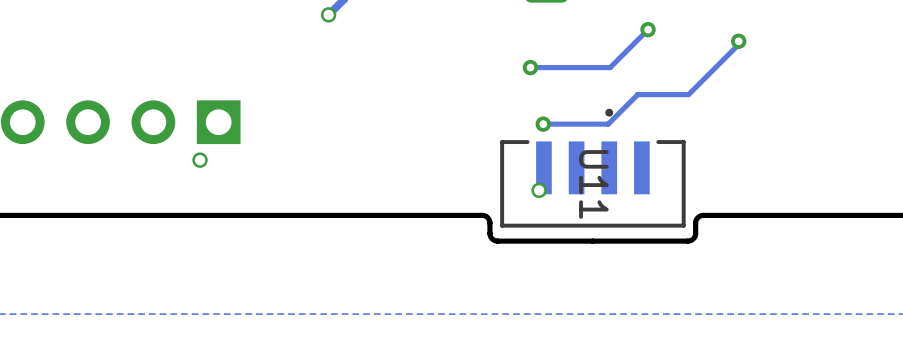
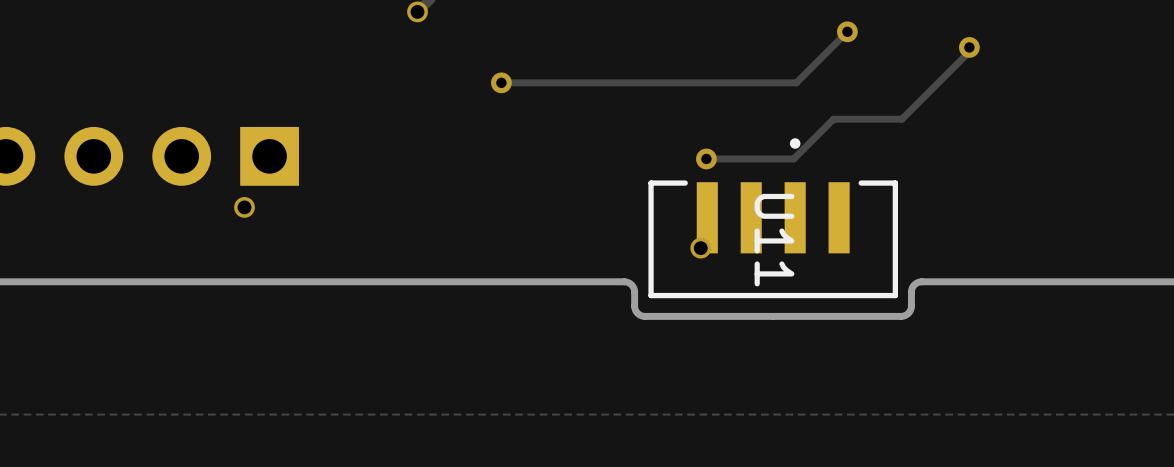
track: none -> (689, 82) (501, 82)
via position: (530, 67) -> (501, 82)

